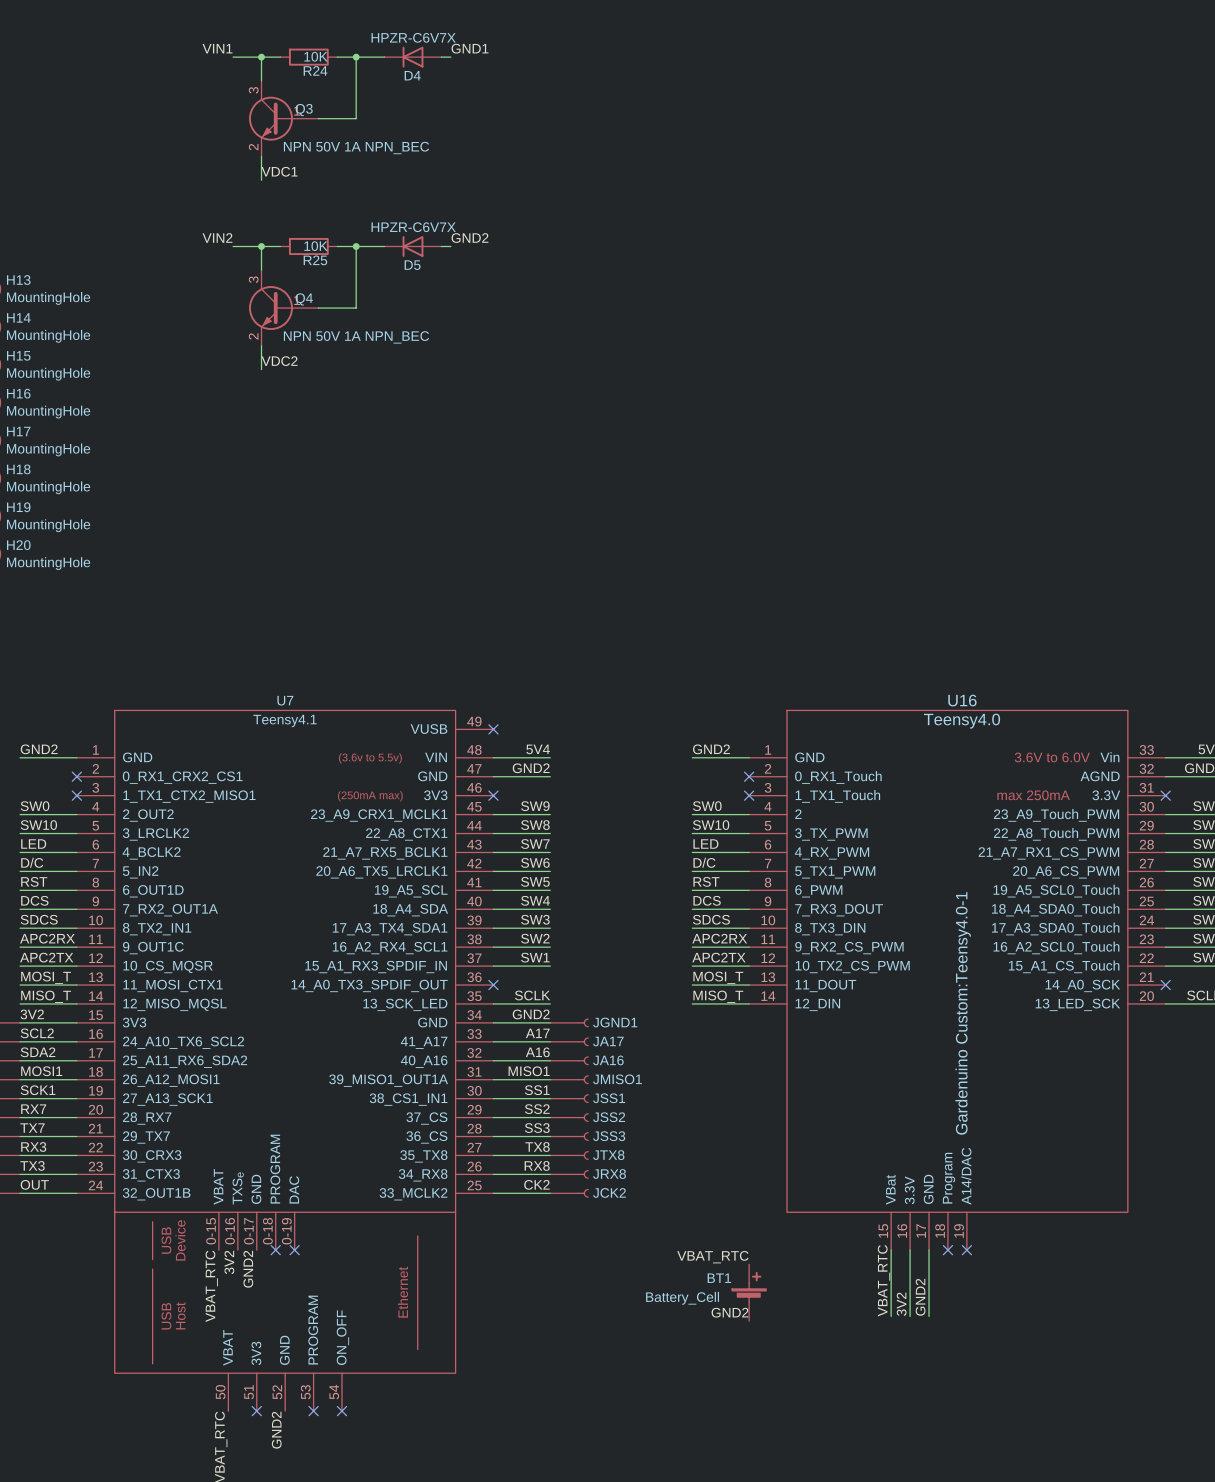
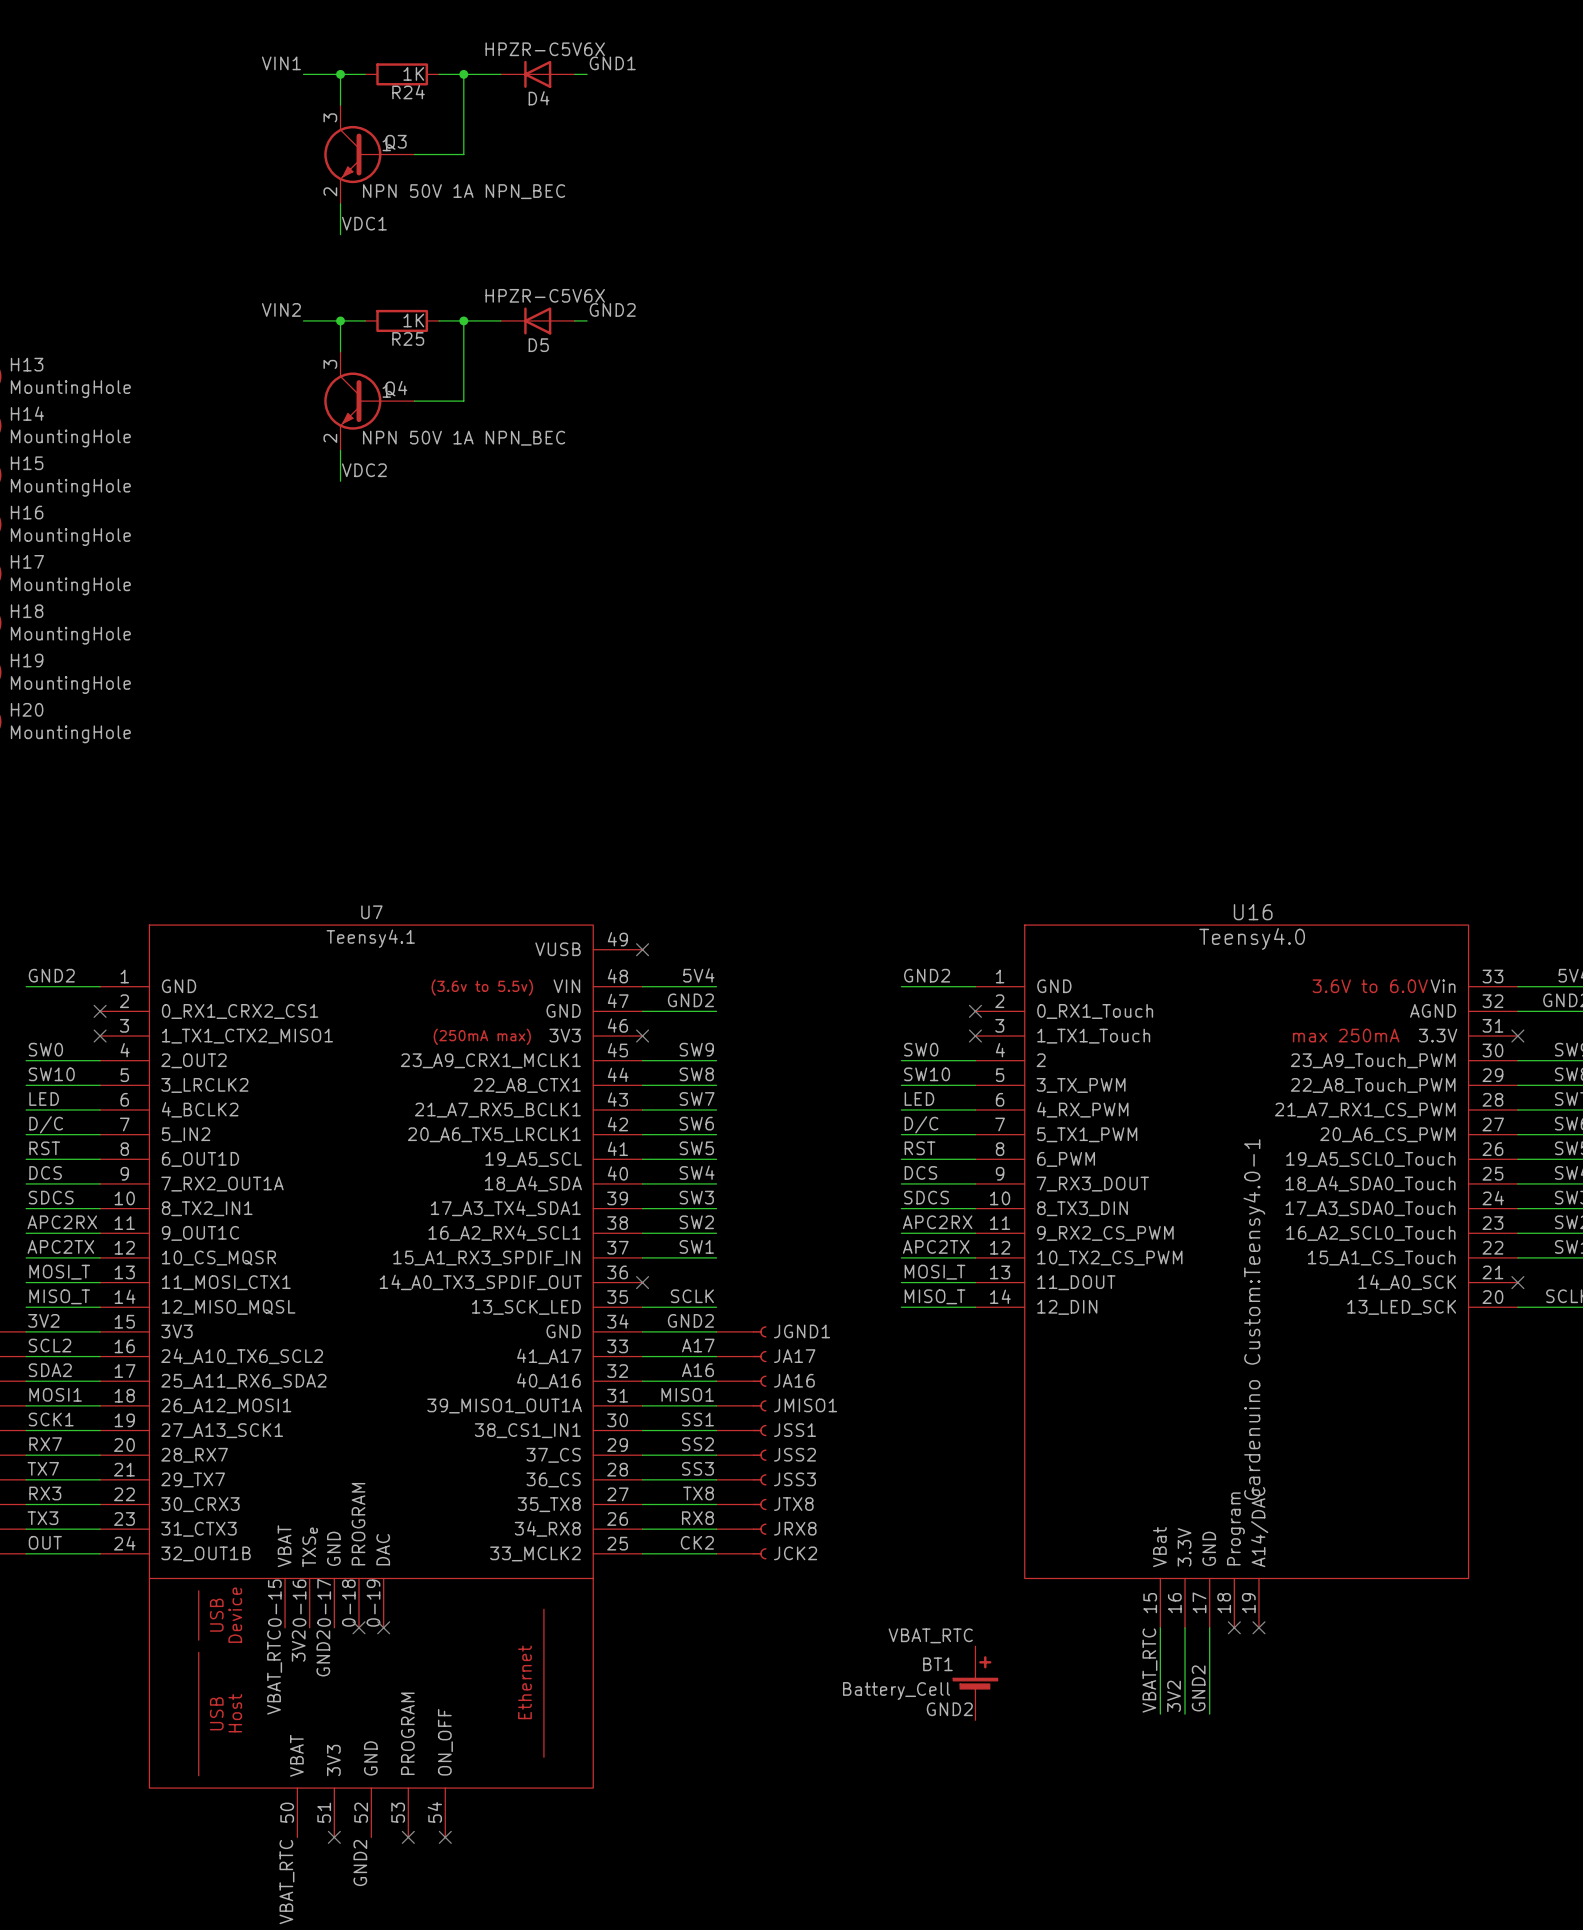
D4 value: HPZR-C6V7X (413, 37) -> HPZR-C5V6X (545, 49)
R24 value: 10K (315, 56) -> 1K (413, 73)
D5 value: HPZR-C6V7X (413, 227) -> HPZR-C5V6X (545, 295)
R25 value: 10K (315, 246) -> 1K (413, 320)

